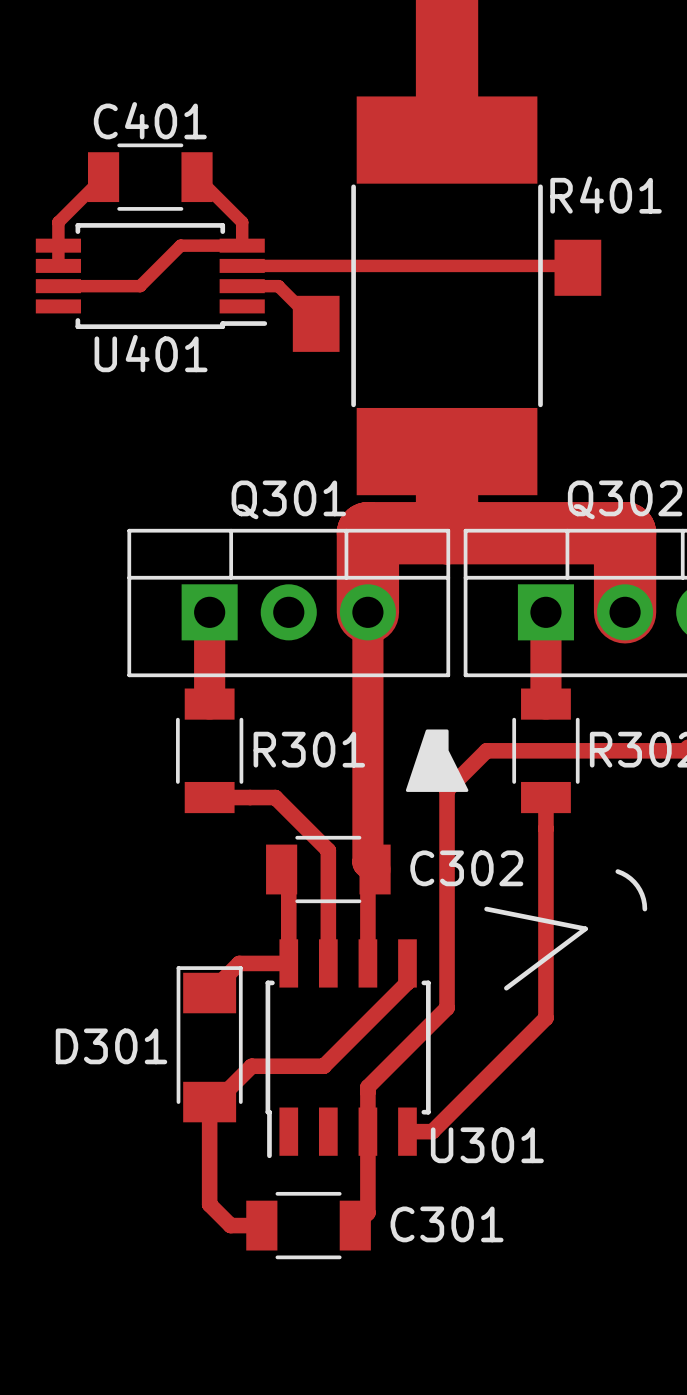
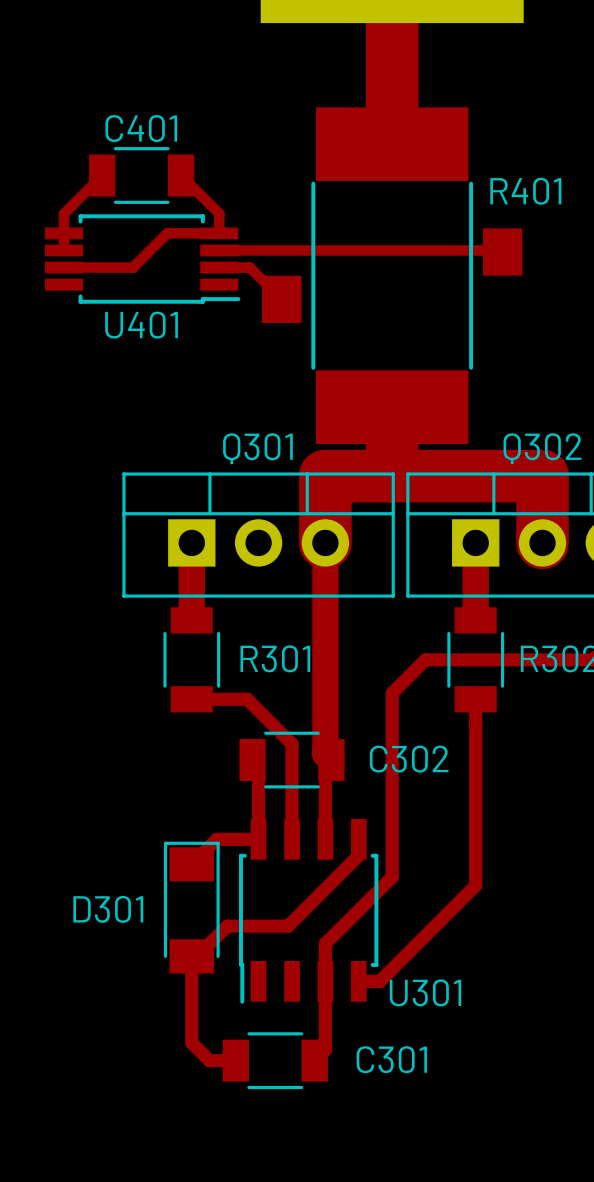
drawing: [405, 729, 469, 792] -> none
line: (617, 871) (630, 878) (637, 885) (643, 899) (644, 909) -> none
line: (486, 909) (585, 928) (506, 988) -> none

